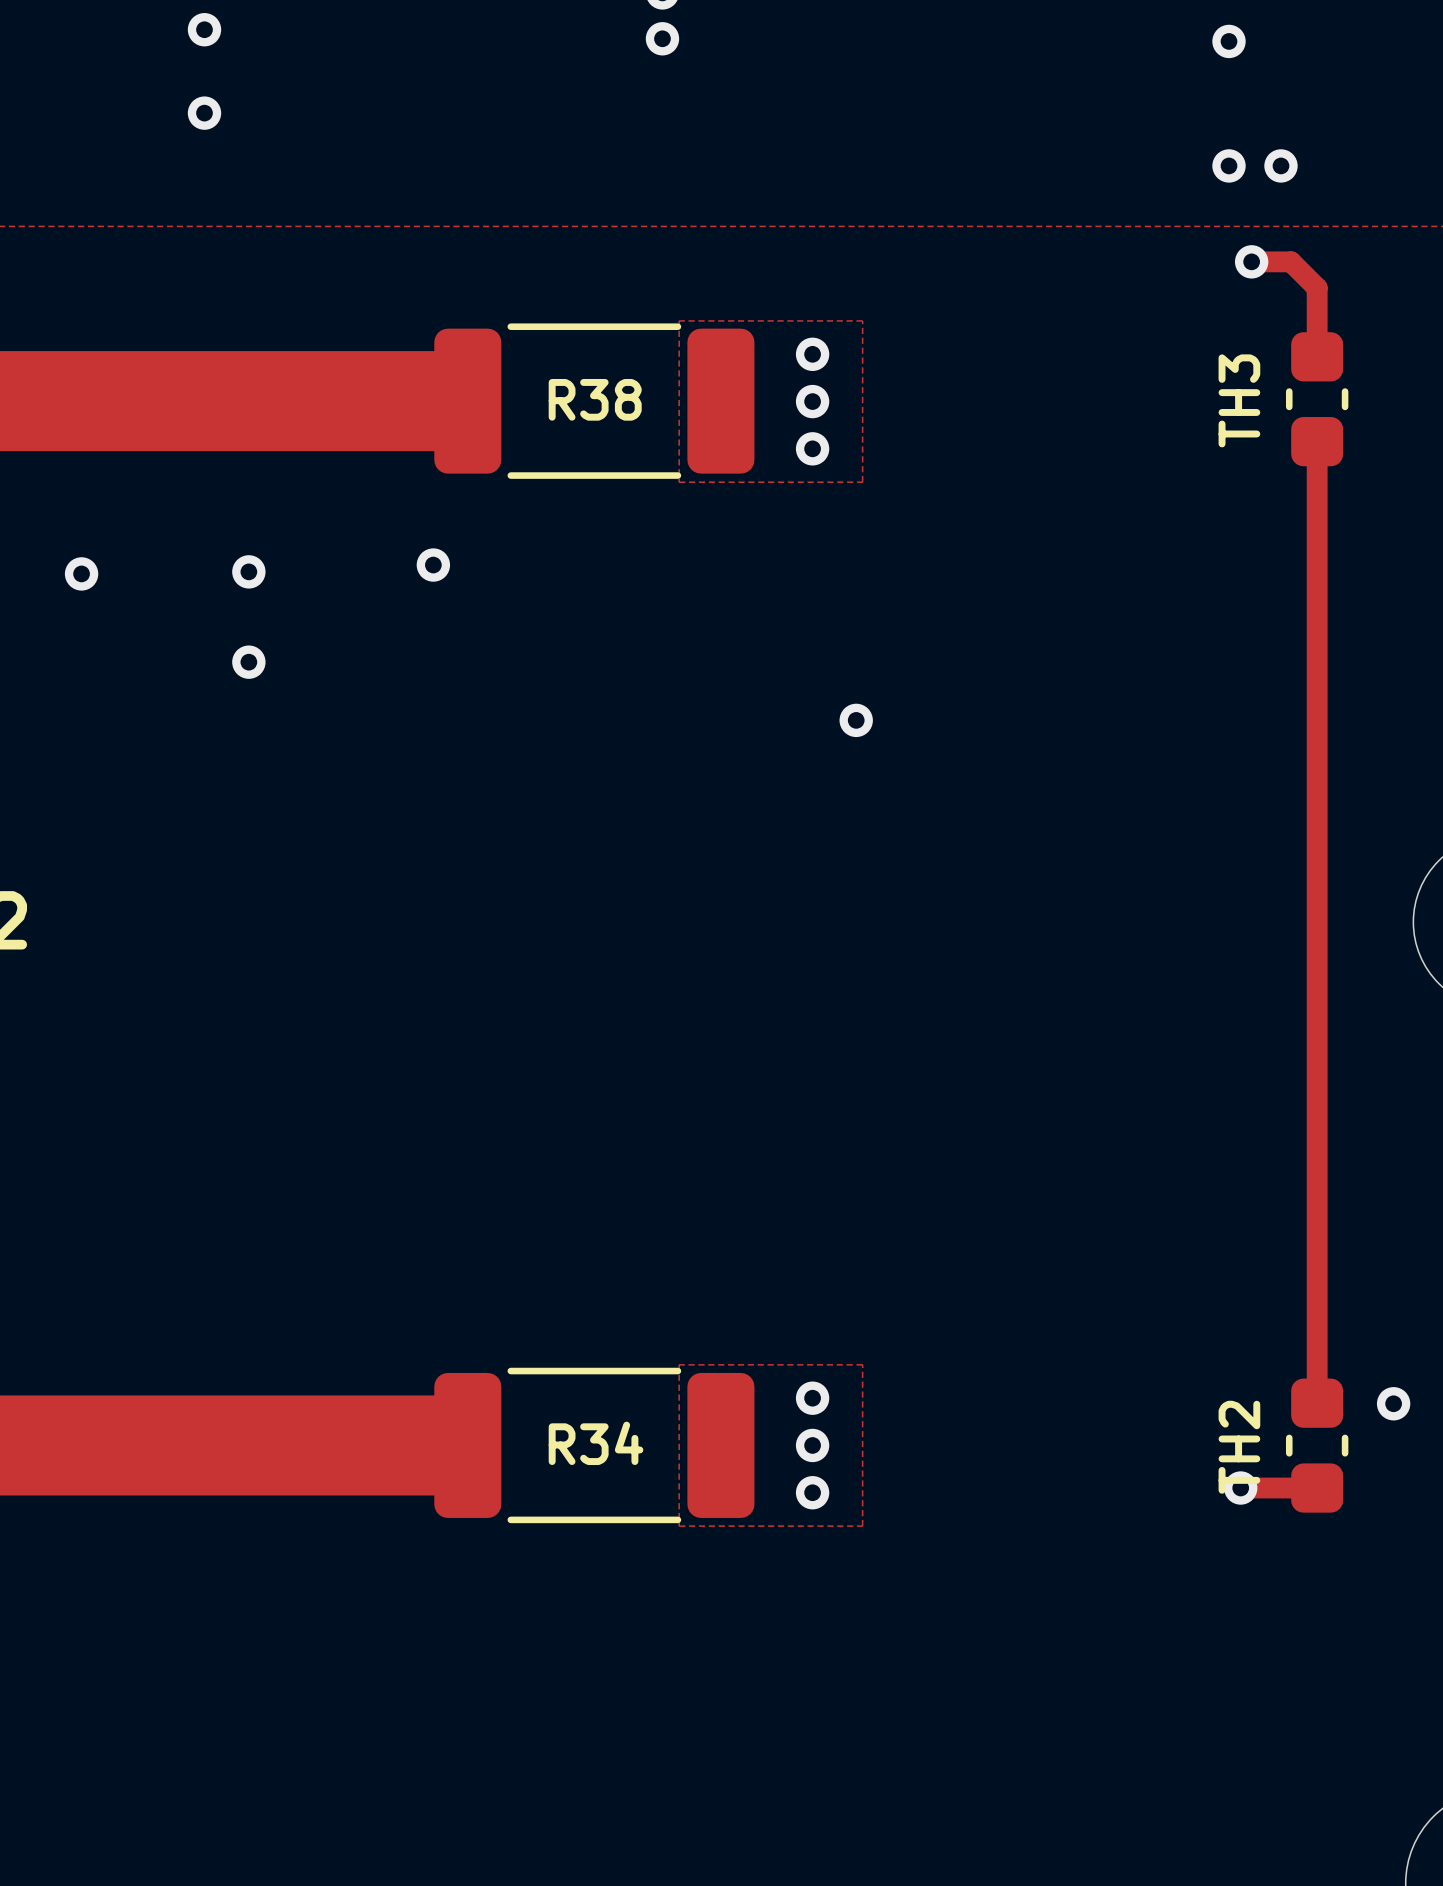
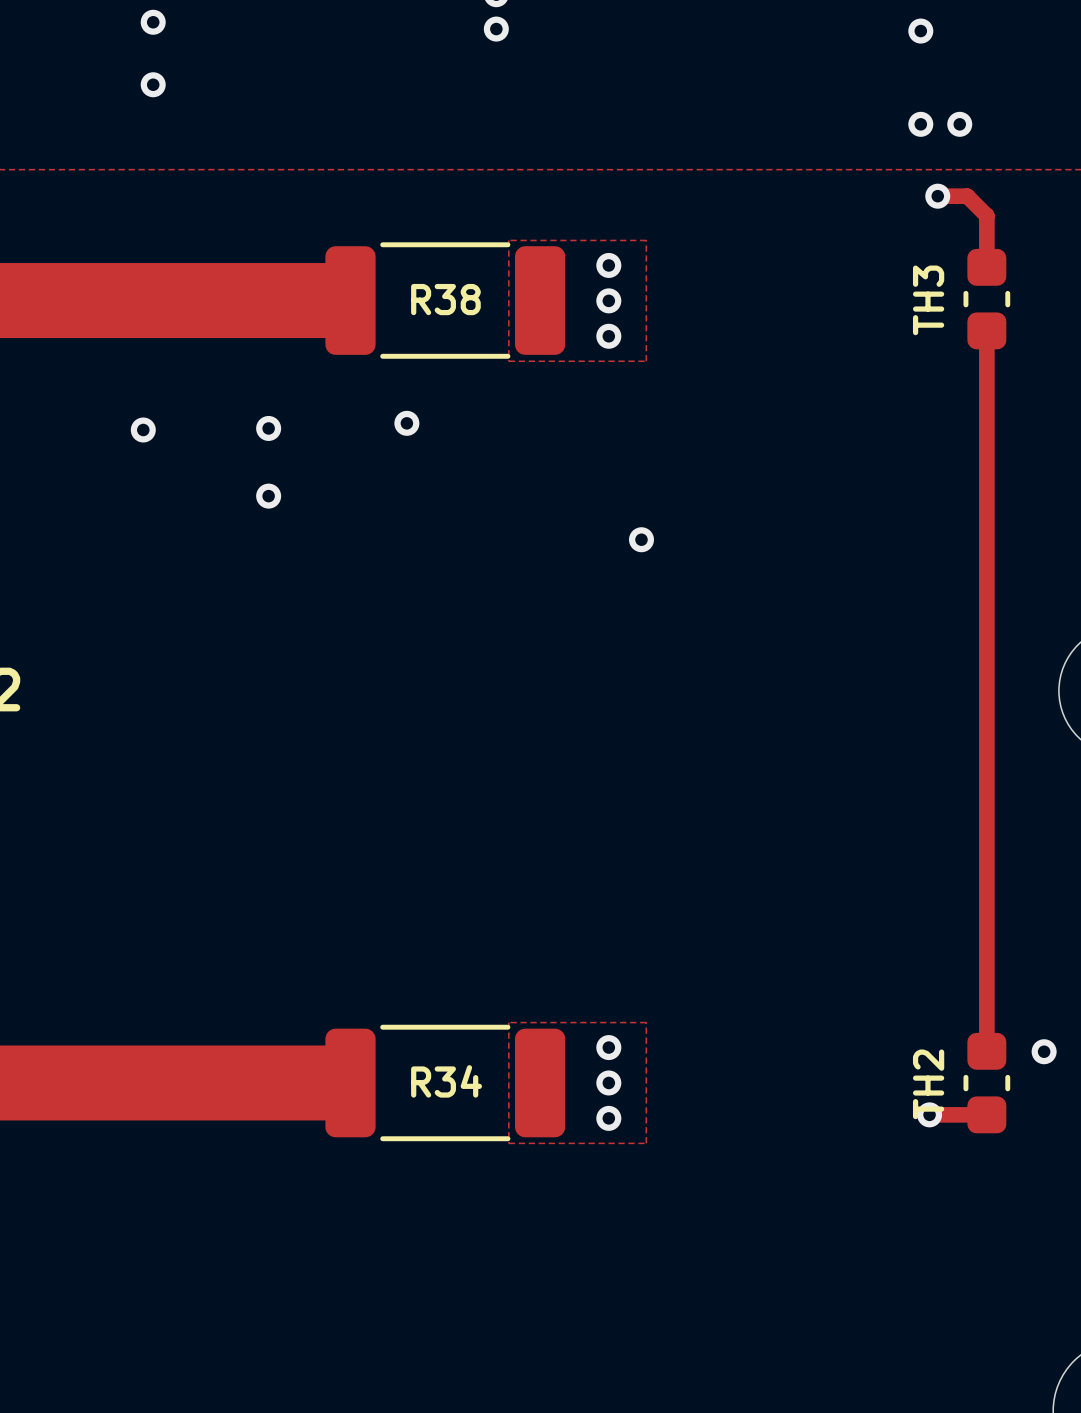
via: (433, 565) -> none
via: none -> (406, 423)
via: (248, 571) -> none
via: none -> (268, 428)
via: (81, 573) -> none
via: none -> (143, 430)
via: (248, 662) -> none
via: none -> (268, 496)

